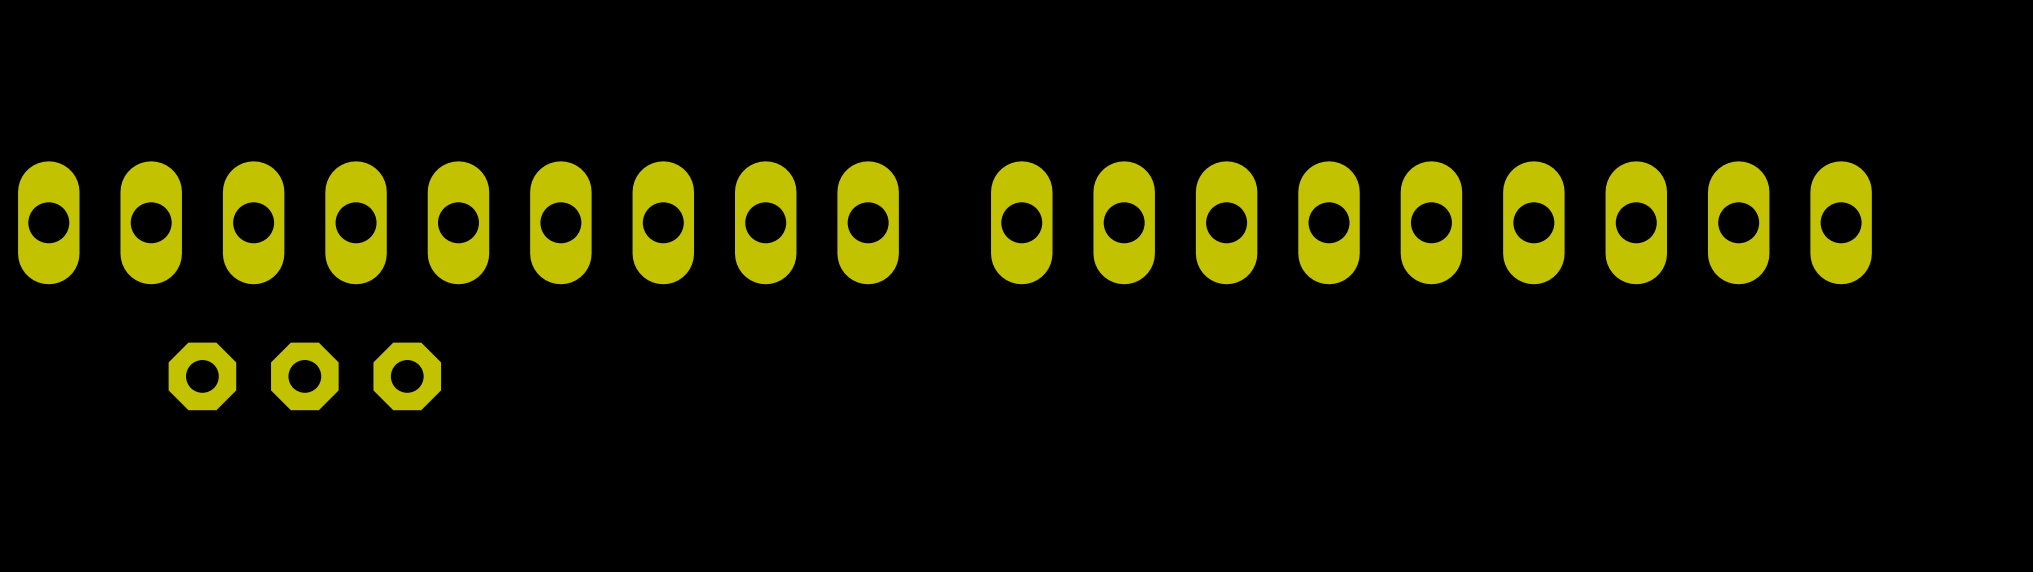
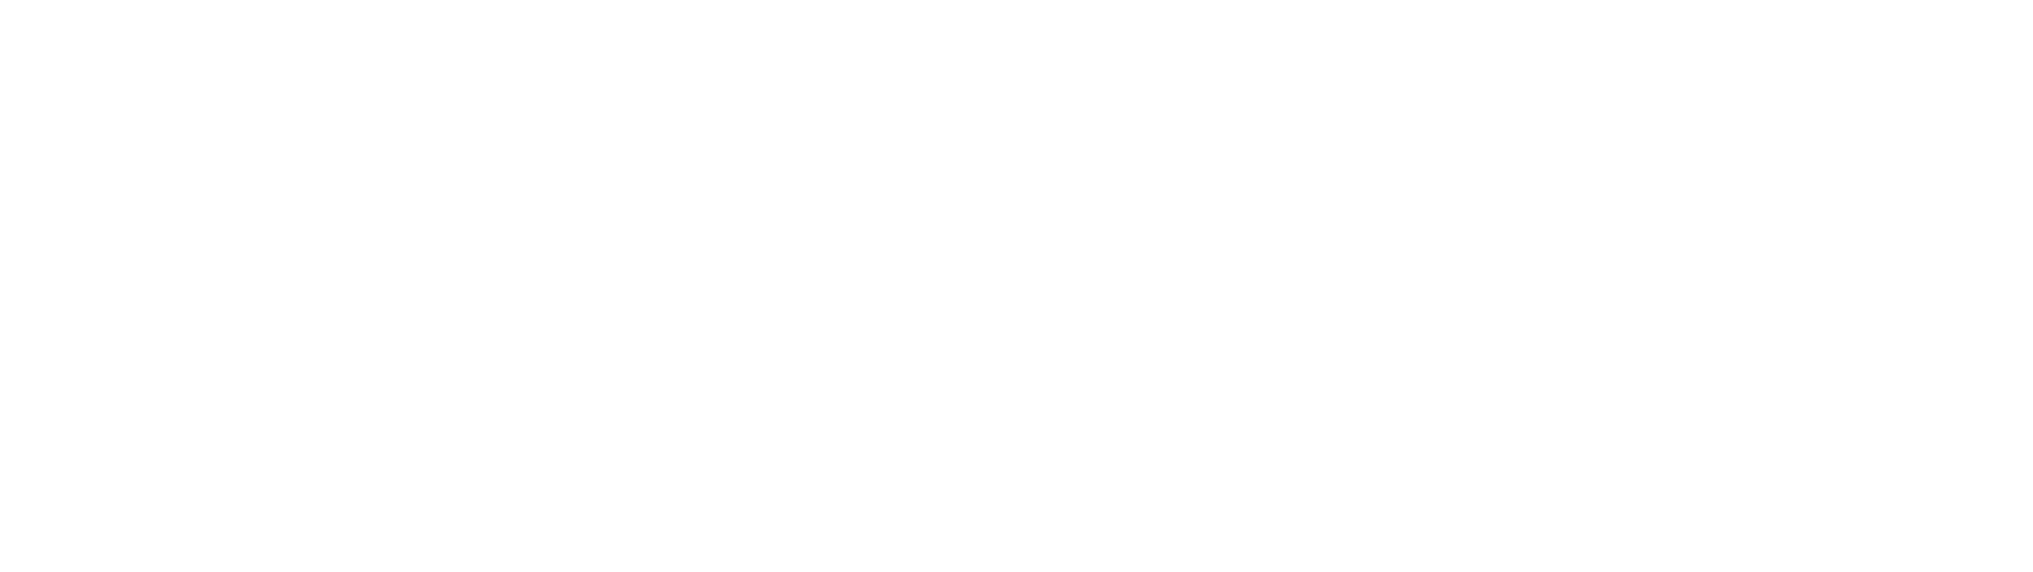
part: (458, 222) -> none
part: (1431, 222) -> none
part: (304, 376) -> none

